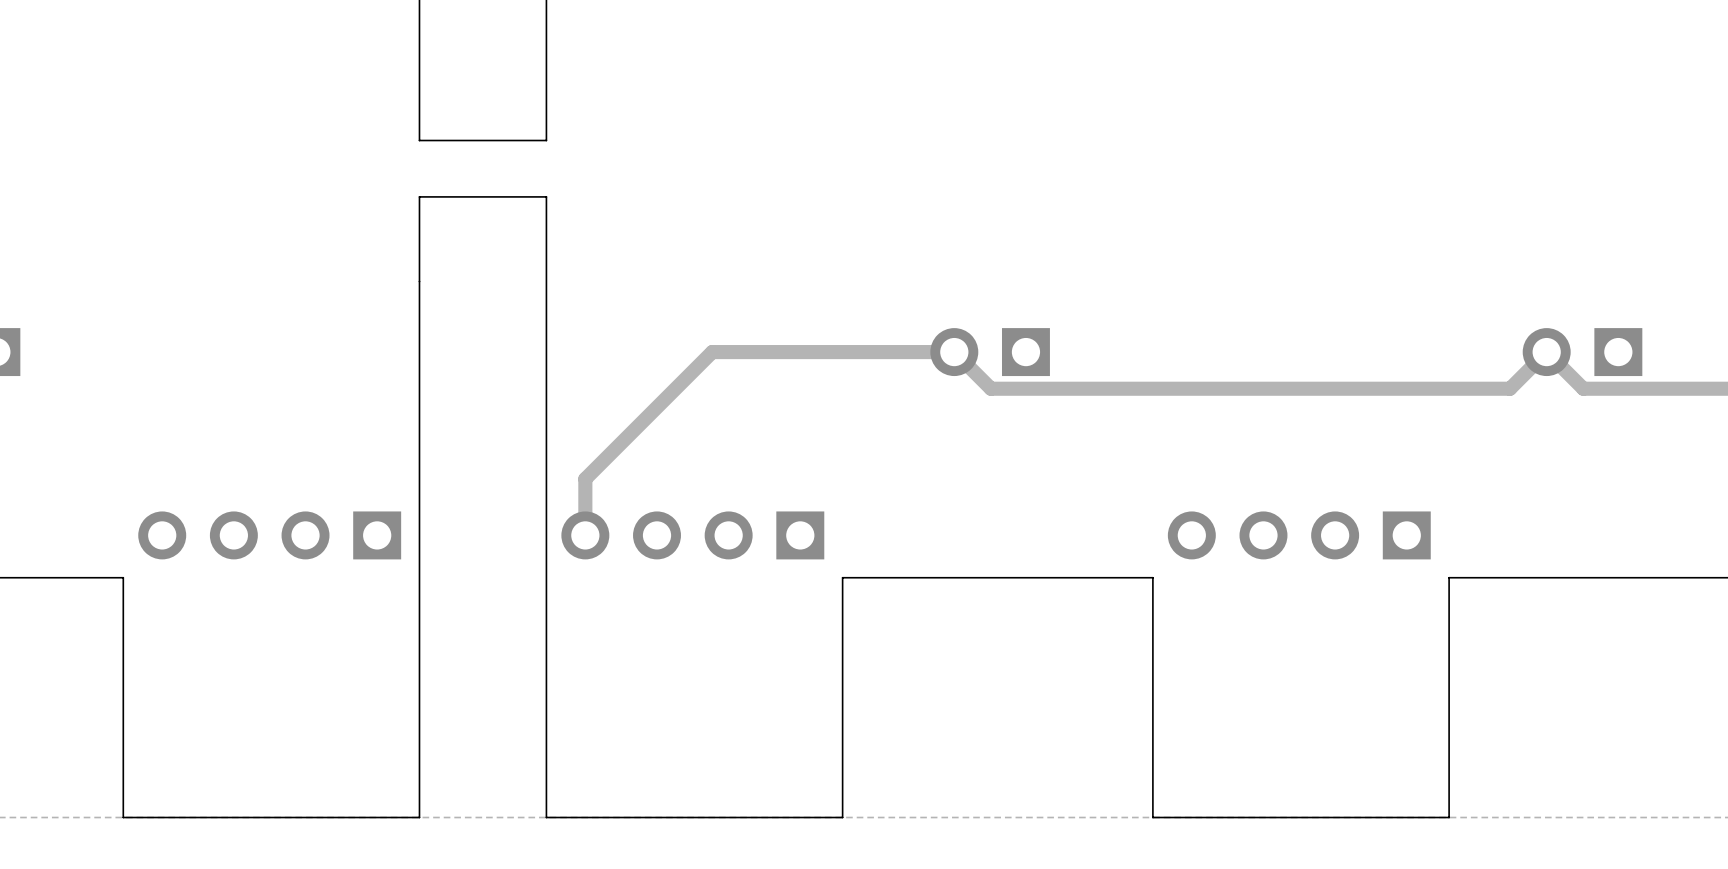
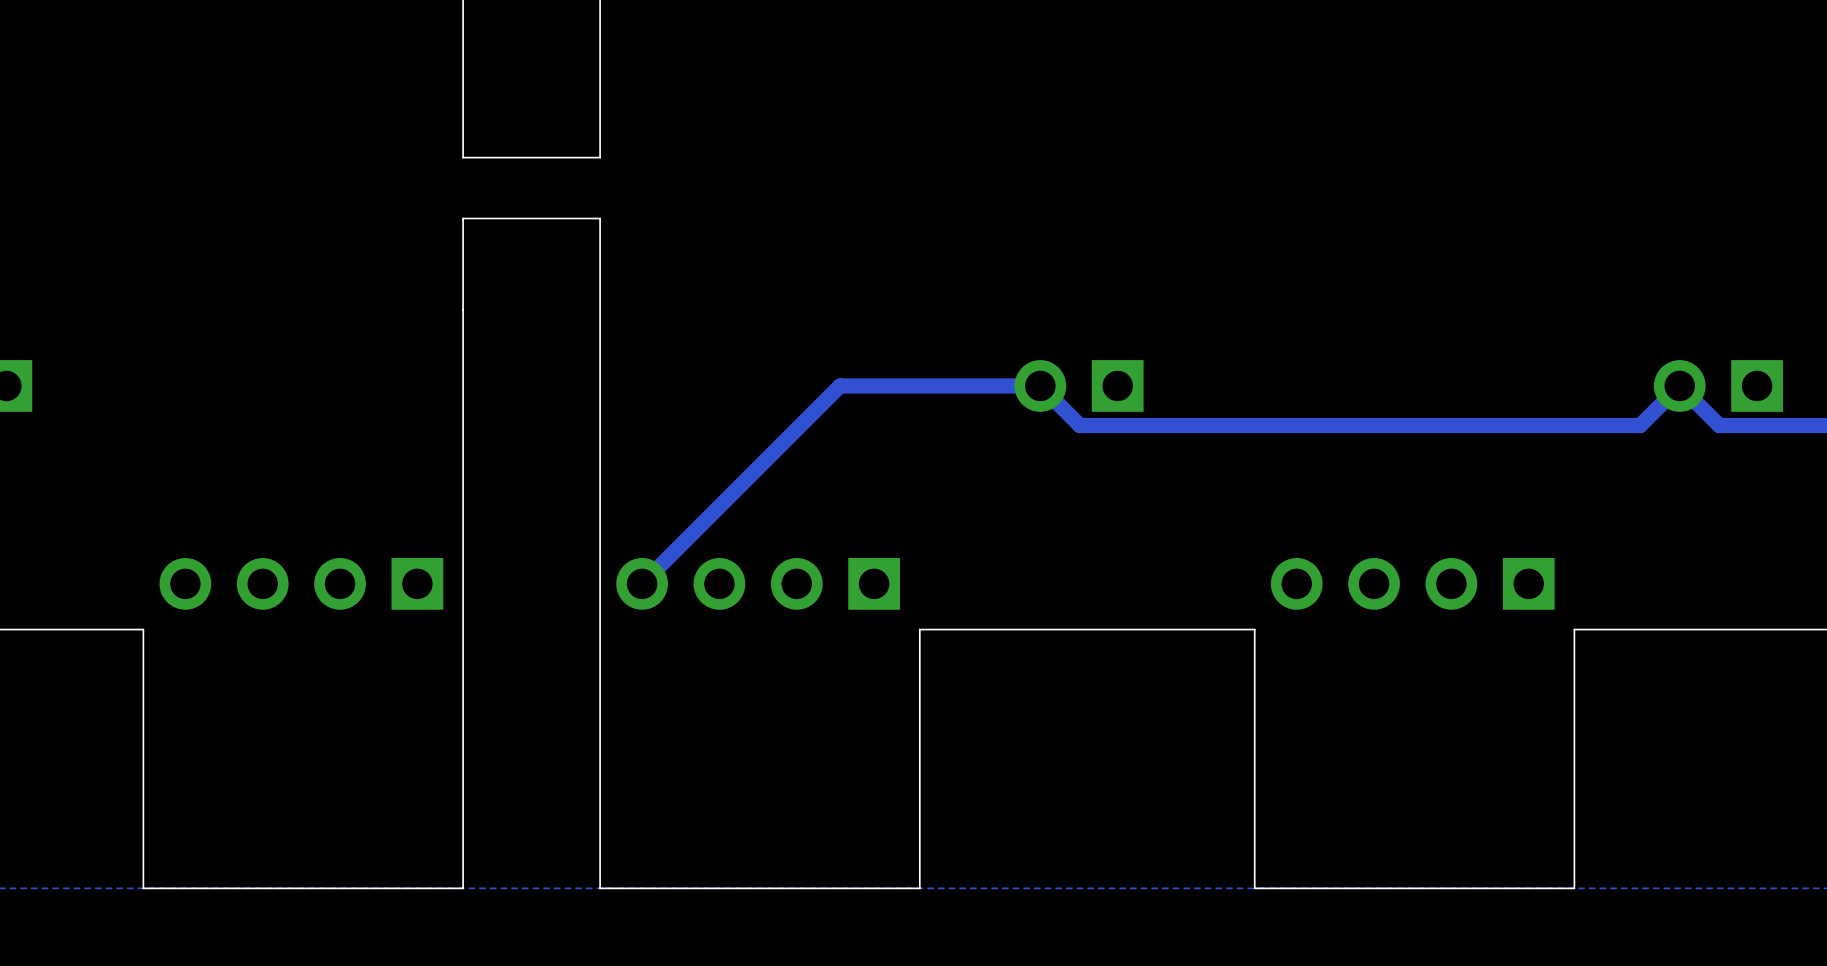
track: (768, 352) (712, 352) (585, 479) (585, 535) -> (840, 385) (642, 583)

